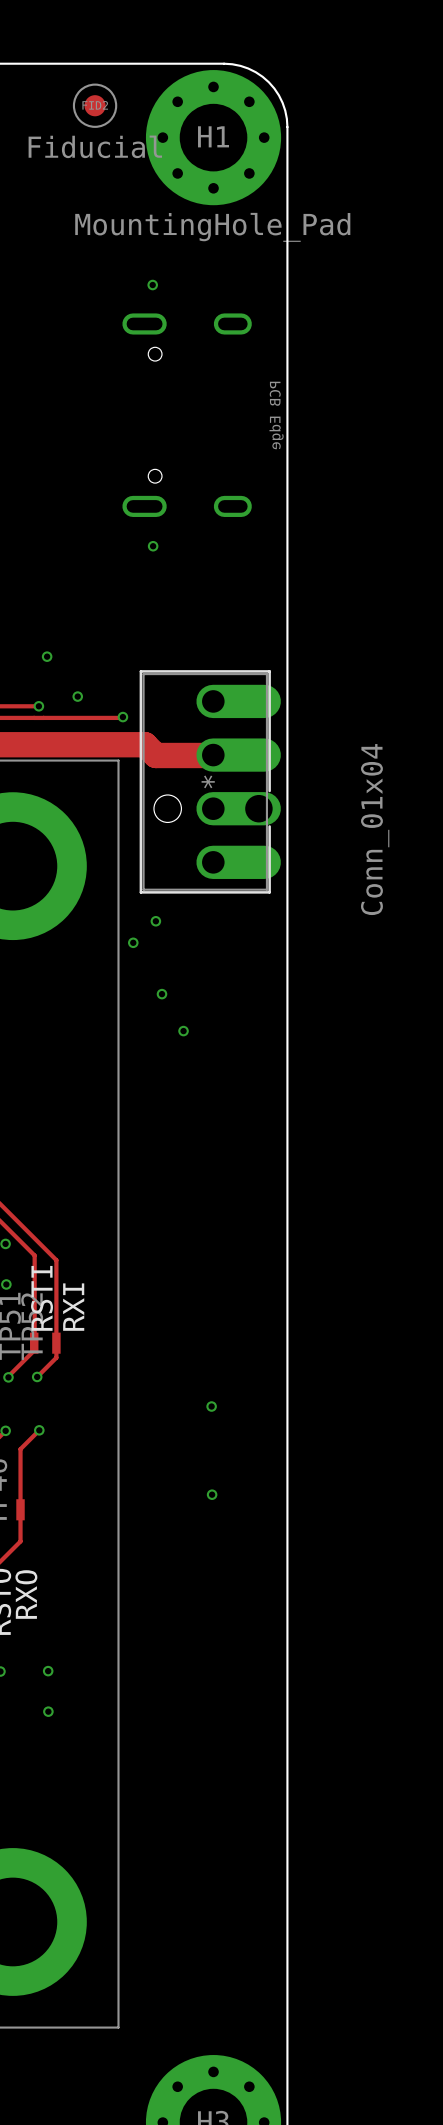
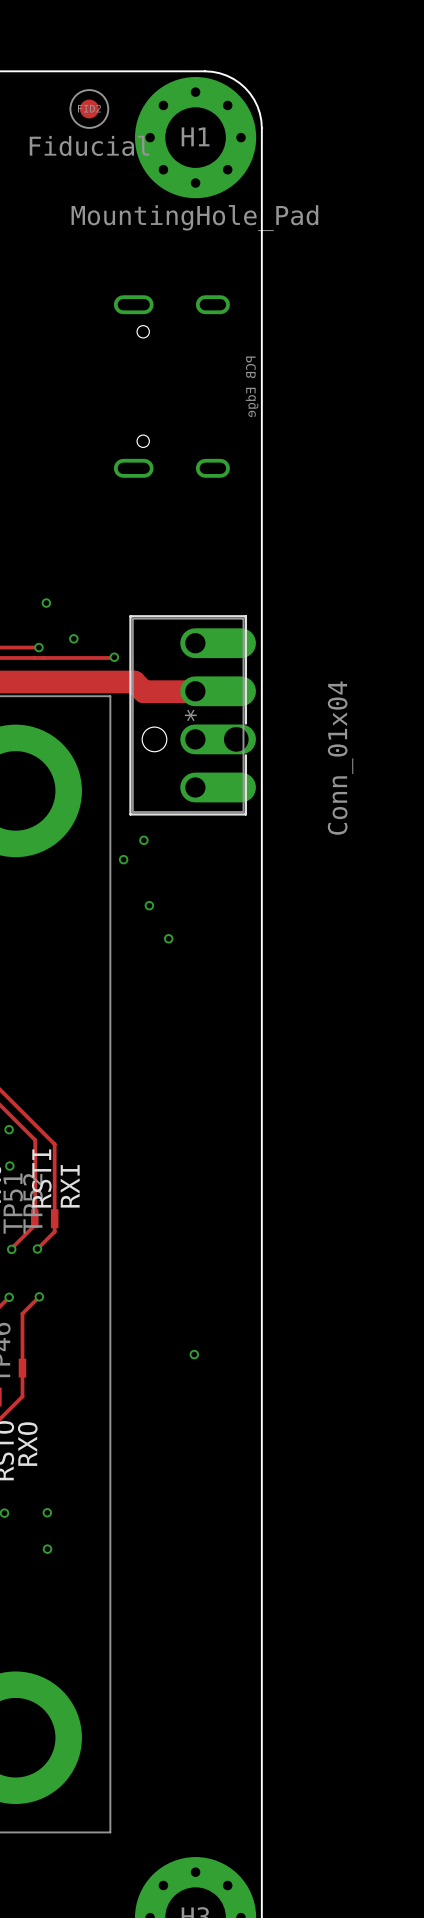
via: (152, 285) -> none
via: (153, 546) -> none
via: (211, 1406) -> none

